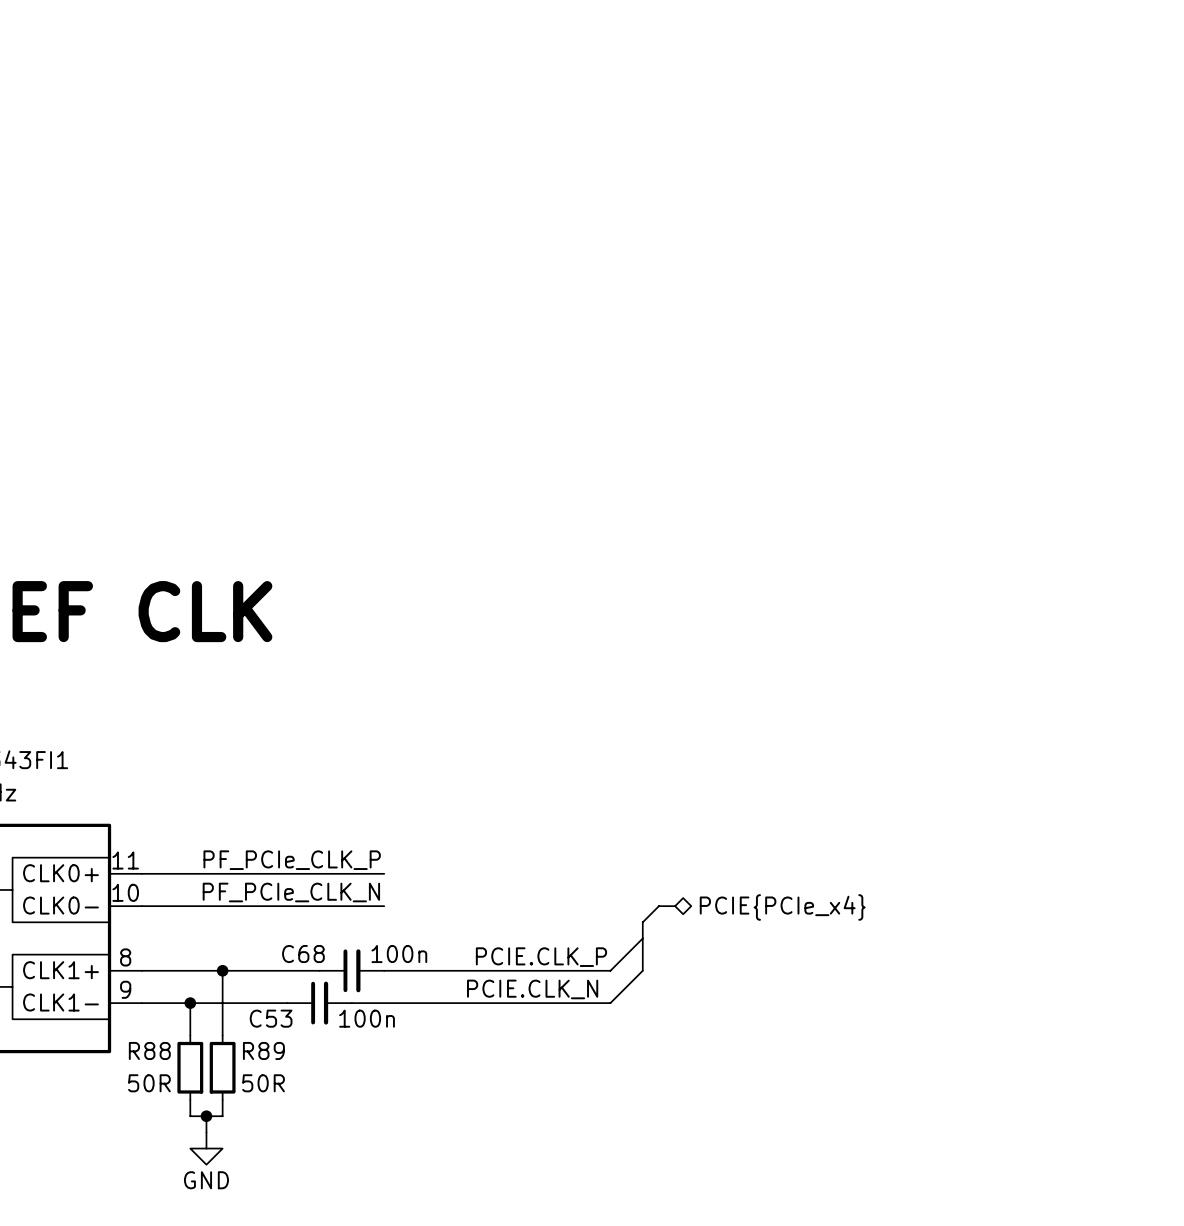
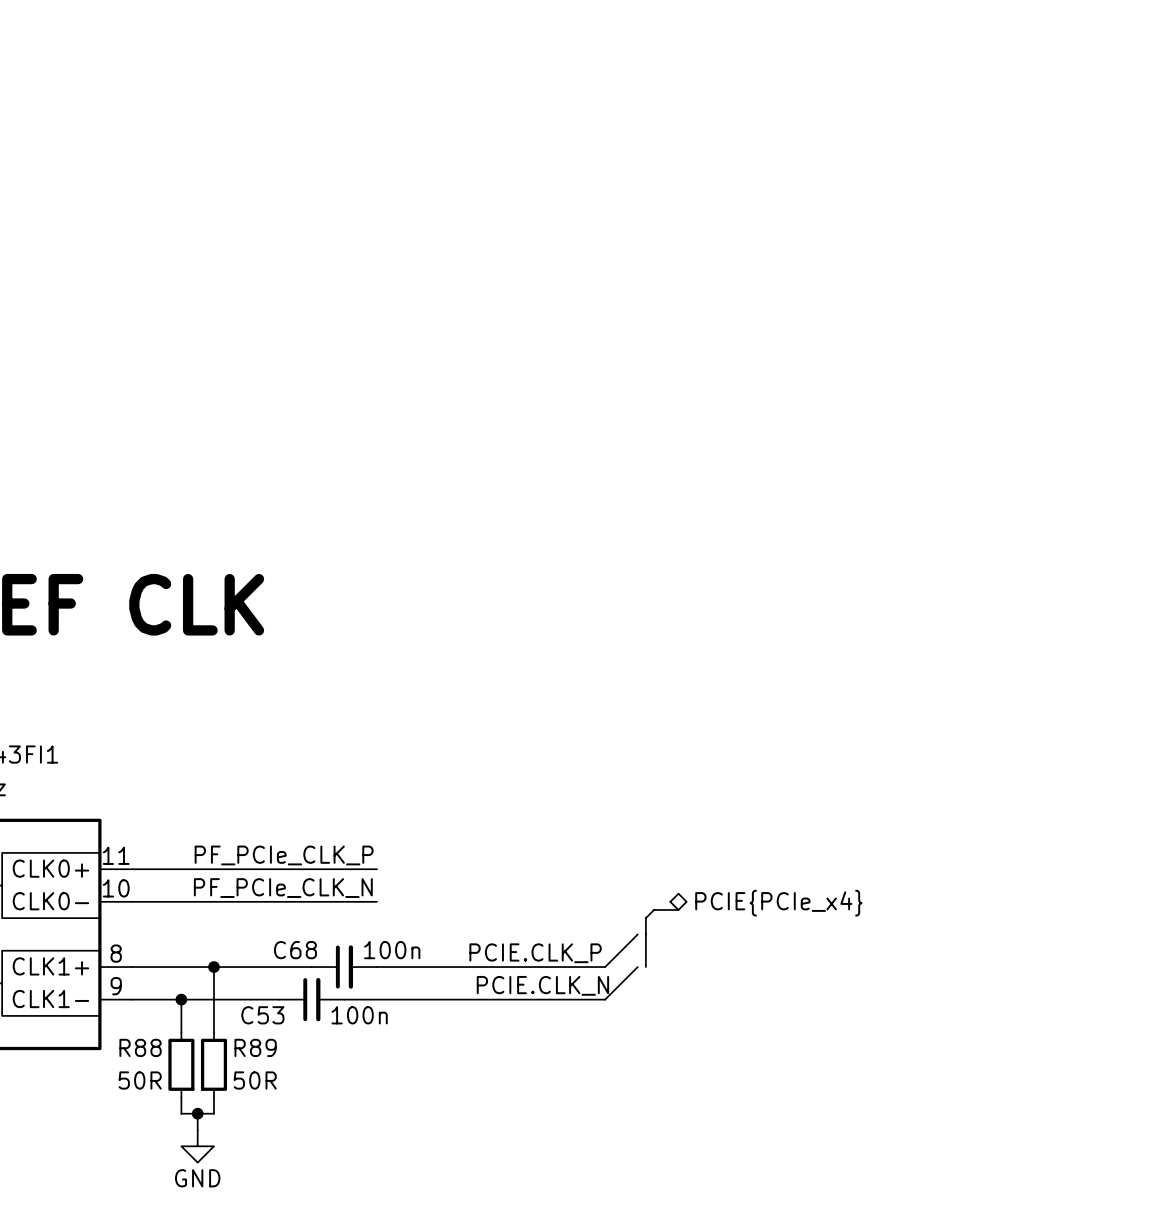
bus: (675, 906) (658, 906) (642, 922) (642, 970) -> none
bus: none -> (678, 909) (654, 909) (645, 918) (645, 967)
label position: PCIE.CLK_N (532, 989) -> PCIE.CLK_N (542, 985)

